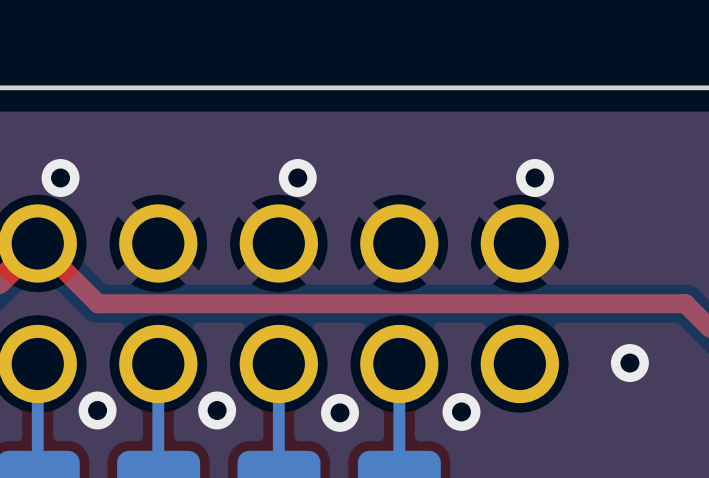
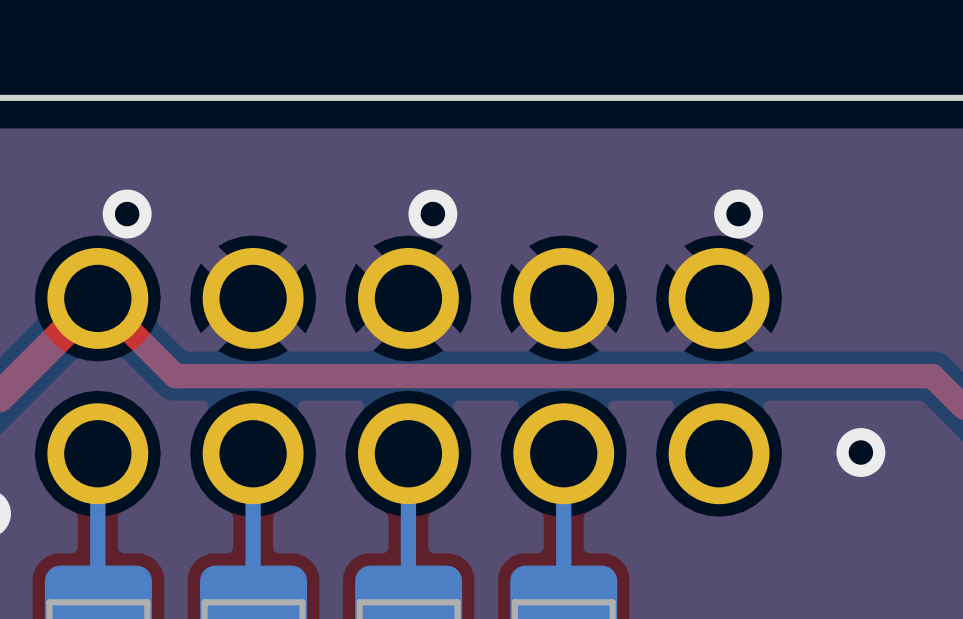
via: (97, 410) -> none
via: (217, 410) -> none
via: (461, 411) -> none
via: (340, 412) -> none

